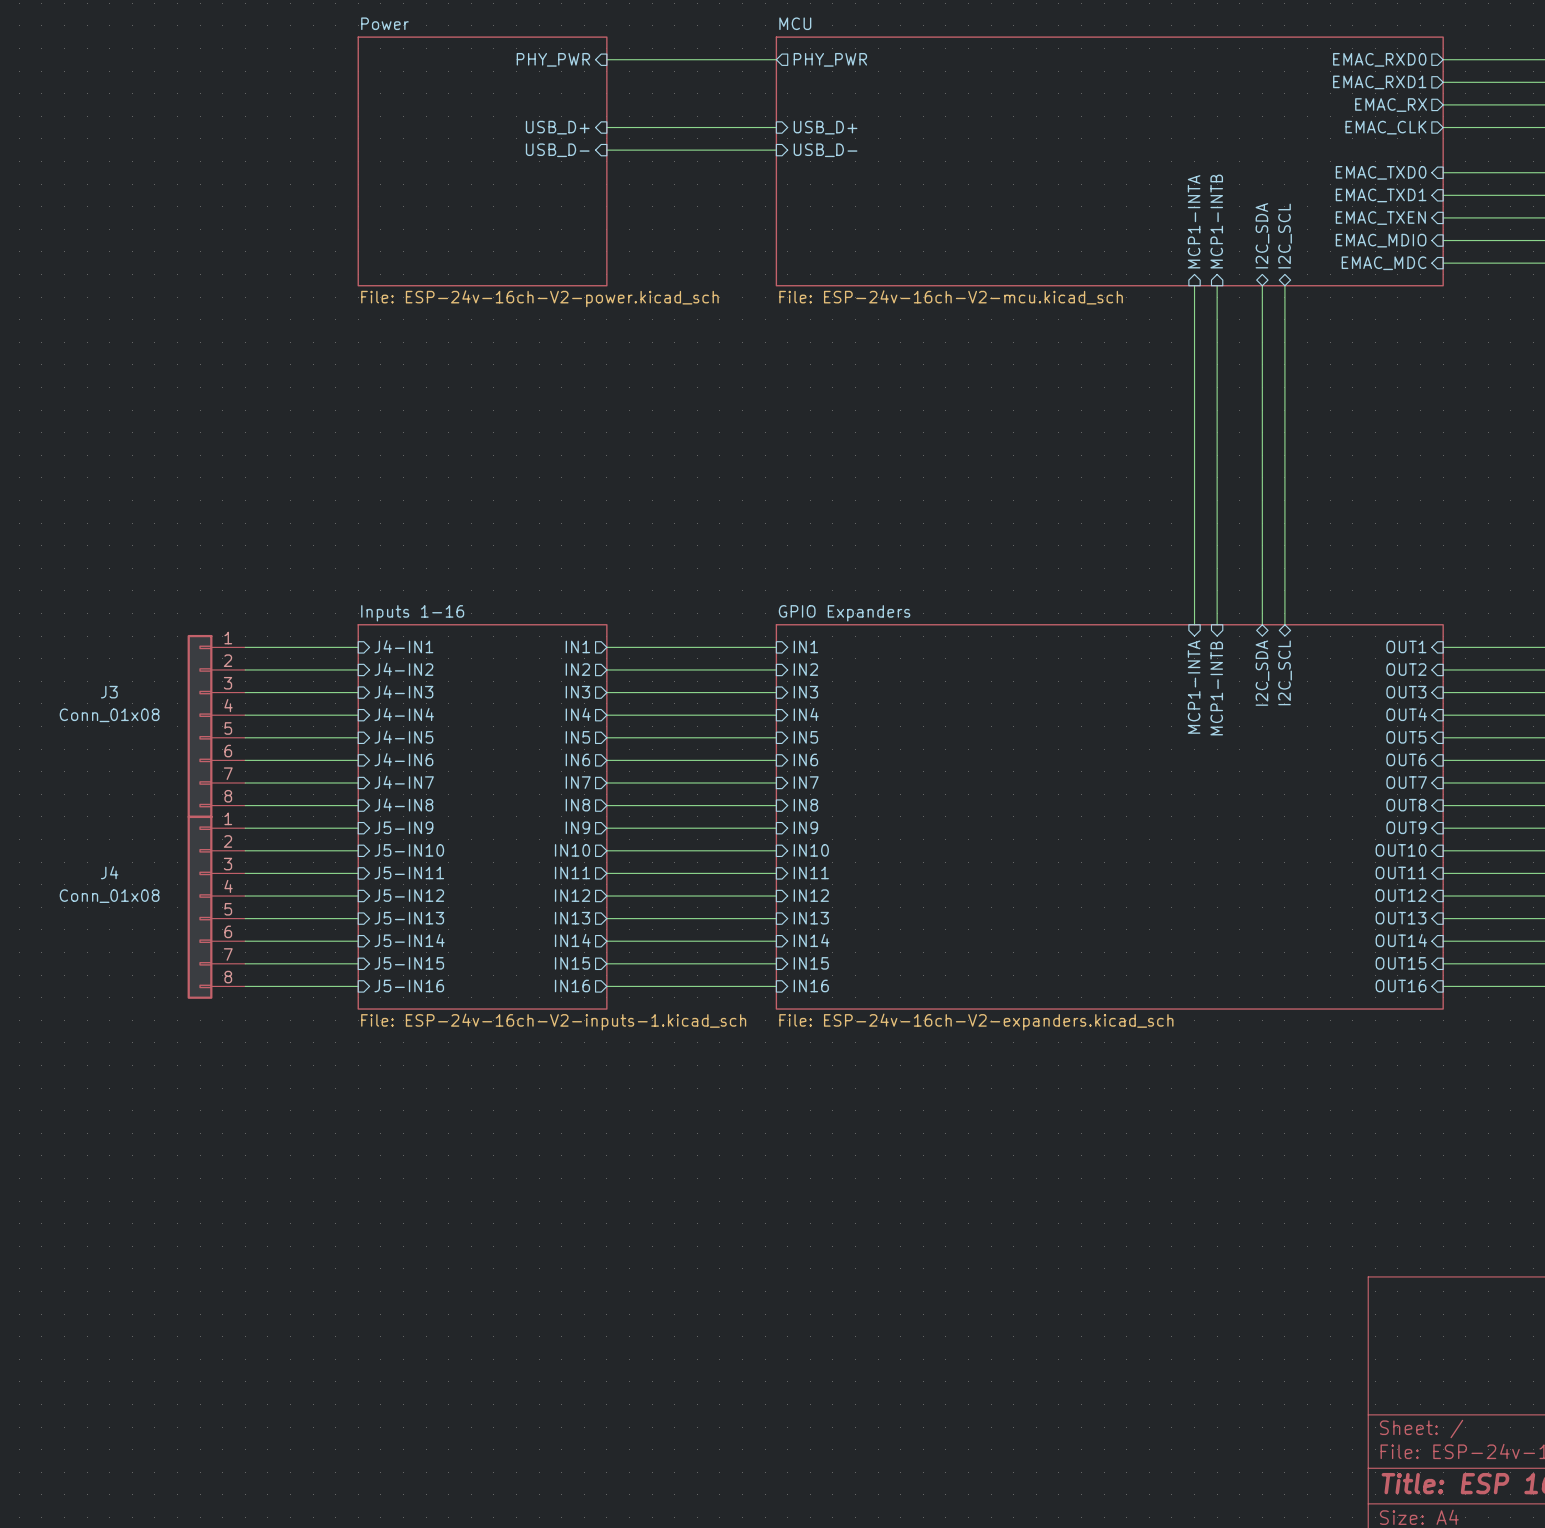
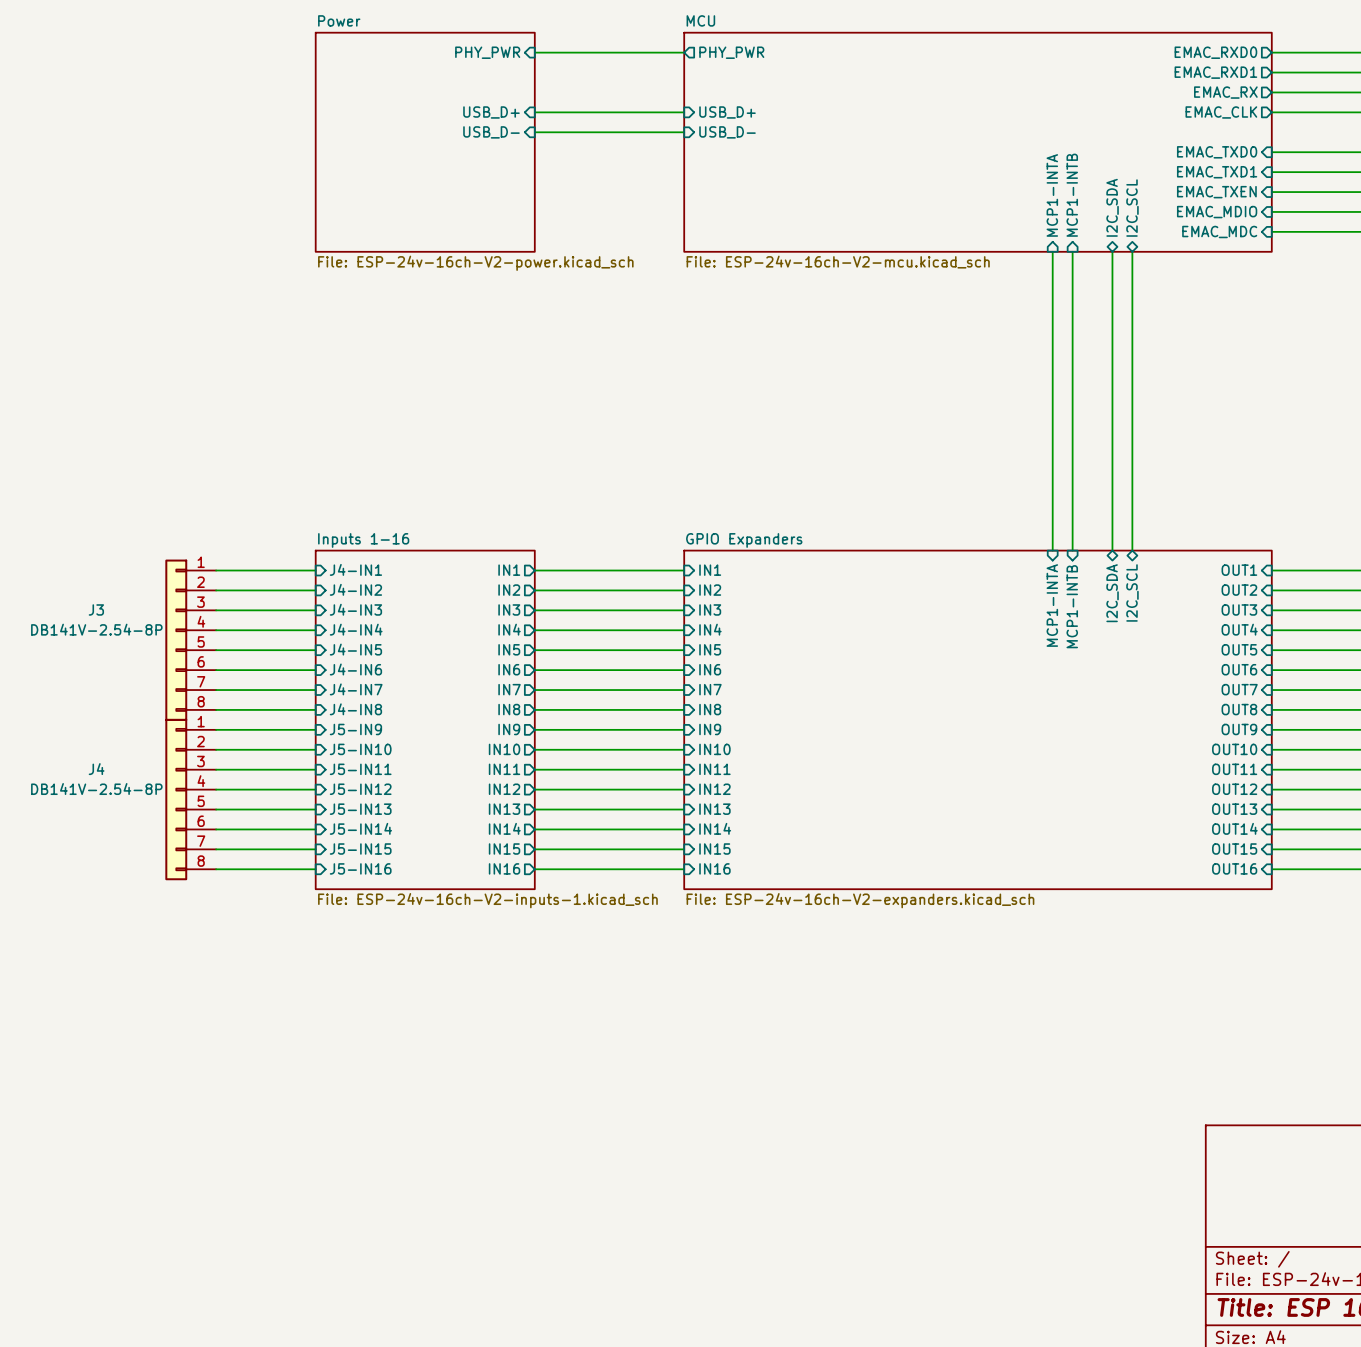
J3 value: Conn_01x08 (109, 715) -> DB141V-2.54-8P (96, 629)
J4 value: Conn_01x08 (109, 896) -> DB141V-2.54-8P (96, 789)

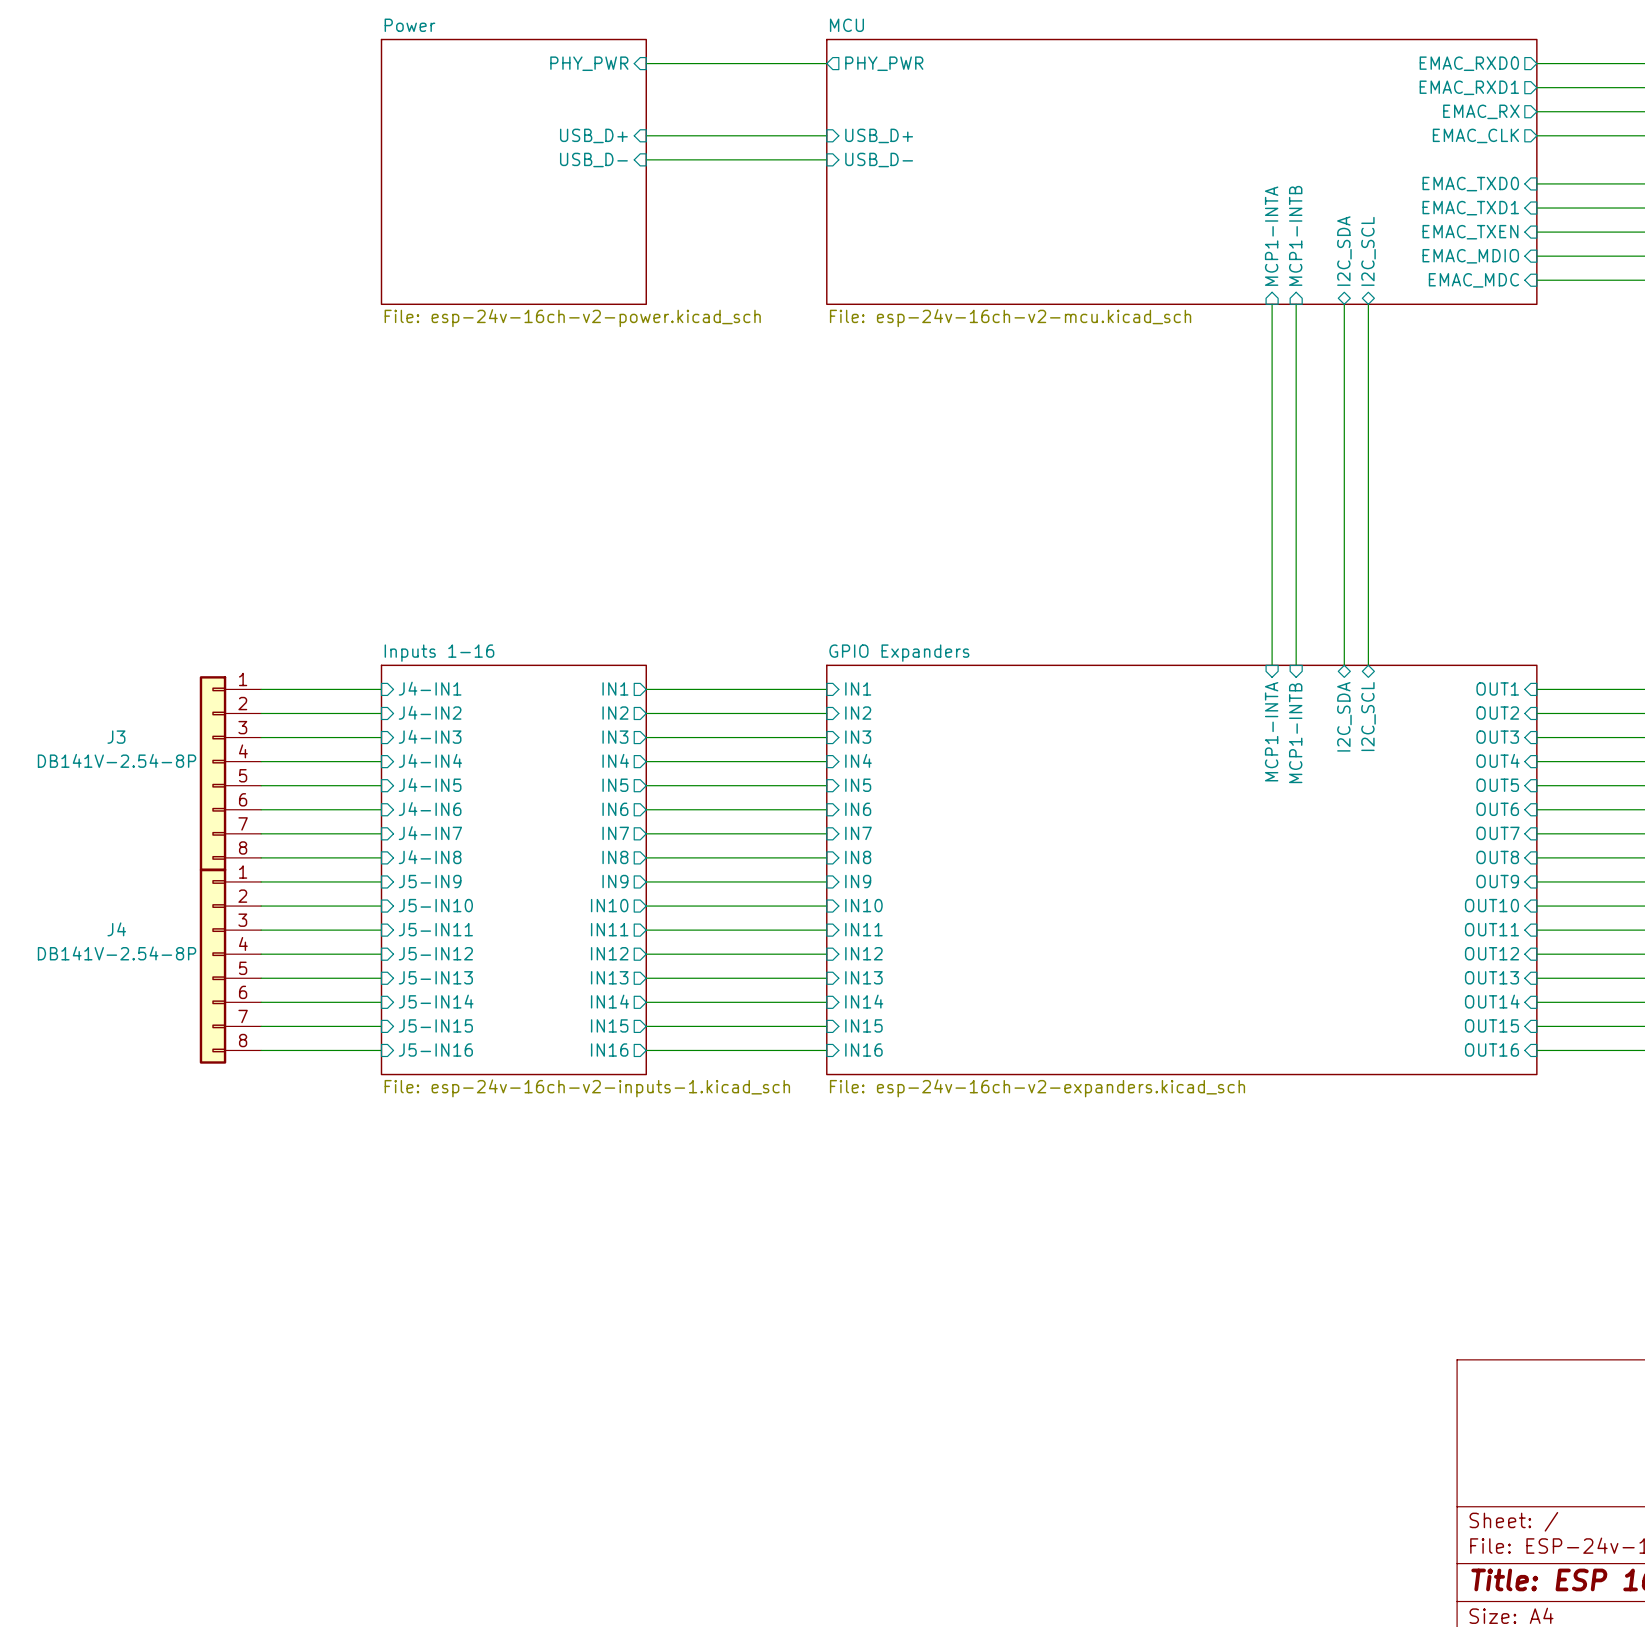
sheet MCU value: File: ESP-24v-16ch-V2-mcu.kicad_sch (838, 262) -> File: esp-24v-16ch-v2-mcu.kicad_sch (1010, 318)
sheet Power value: File: ESP-24v-16ch-V2-power.kicad_sch (475, 263) -> File: esp-24v-16ch-v2-power.kicad_sch (572, 318)
sheet Inputs 1-16 value: File: ESP-24v-16ch-V2-inputs-1.kicad_sch (487, 900) -> File: esp-24v-16ch-v2-inputs-1.kicad_sch (587, 1088)
sheet GPIO Expanders value: File: ESP-24v-16ch-V2-expanders.kicad_sch (860, 900) -> File: esp-24v-16ch-v2-expanders.kicad_sch (1037, 1088)

